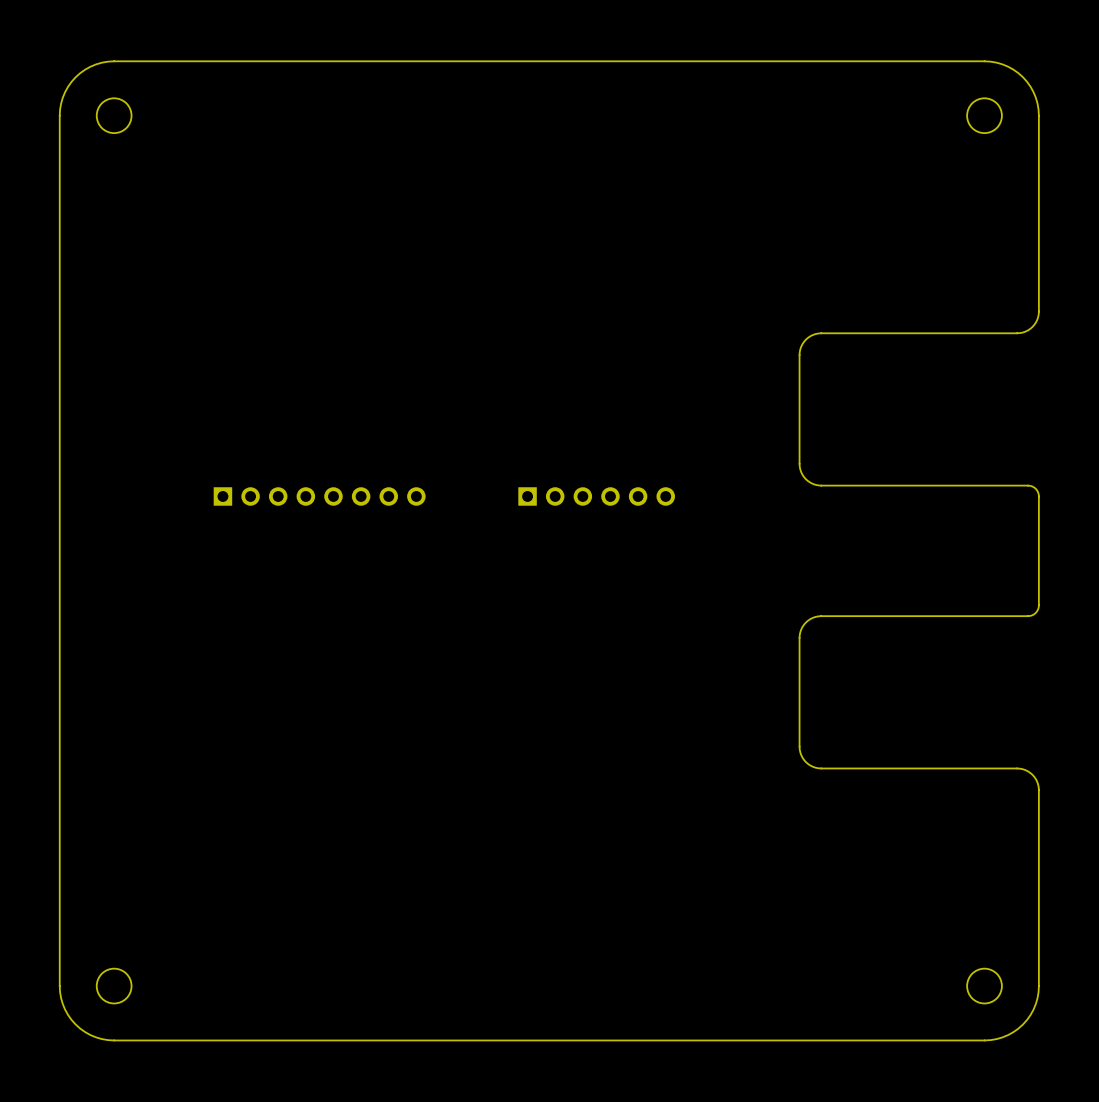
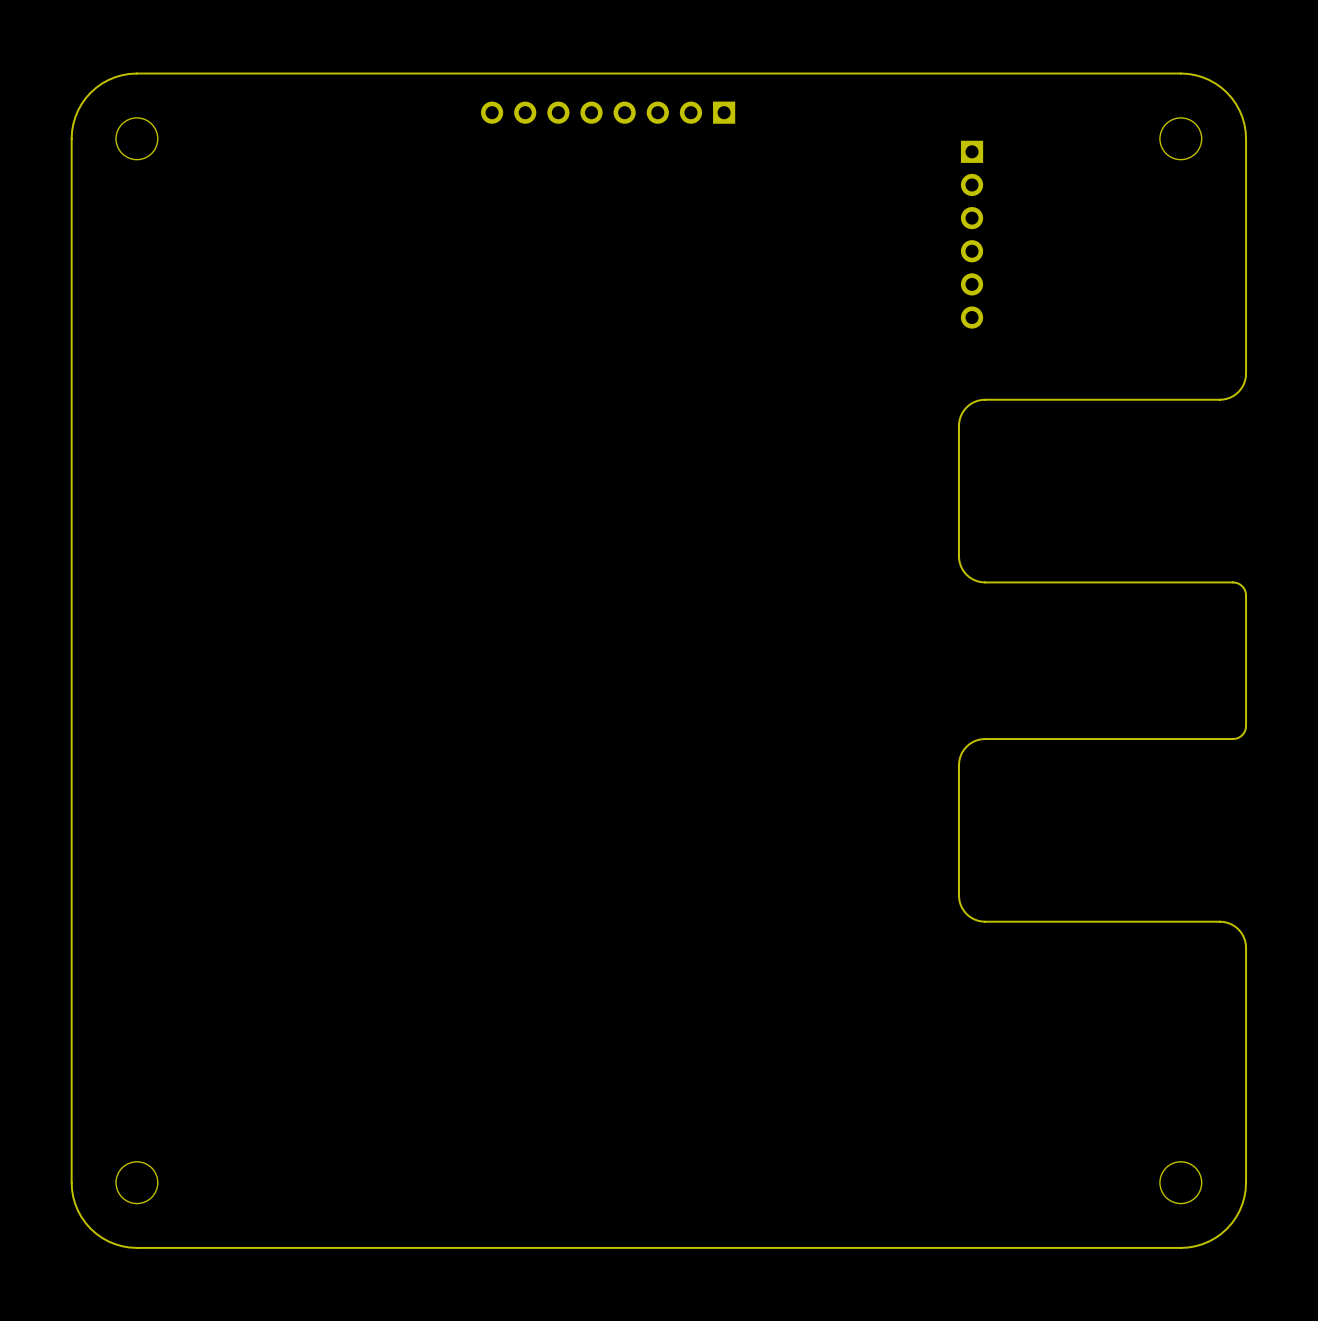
part: none -> (608, 112)
part: none -> (972, 234)
part: (319, 496) -> none
part: (596, 496) -> none

